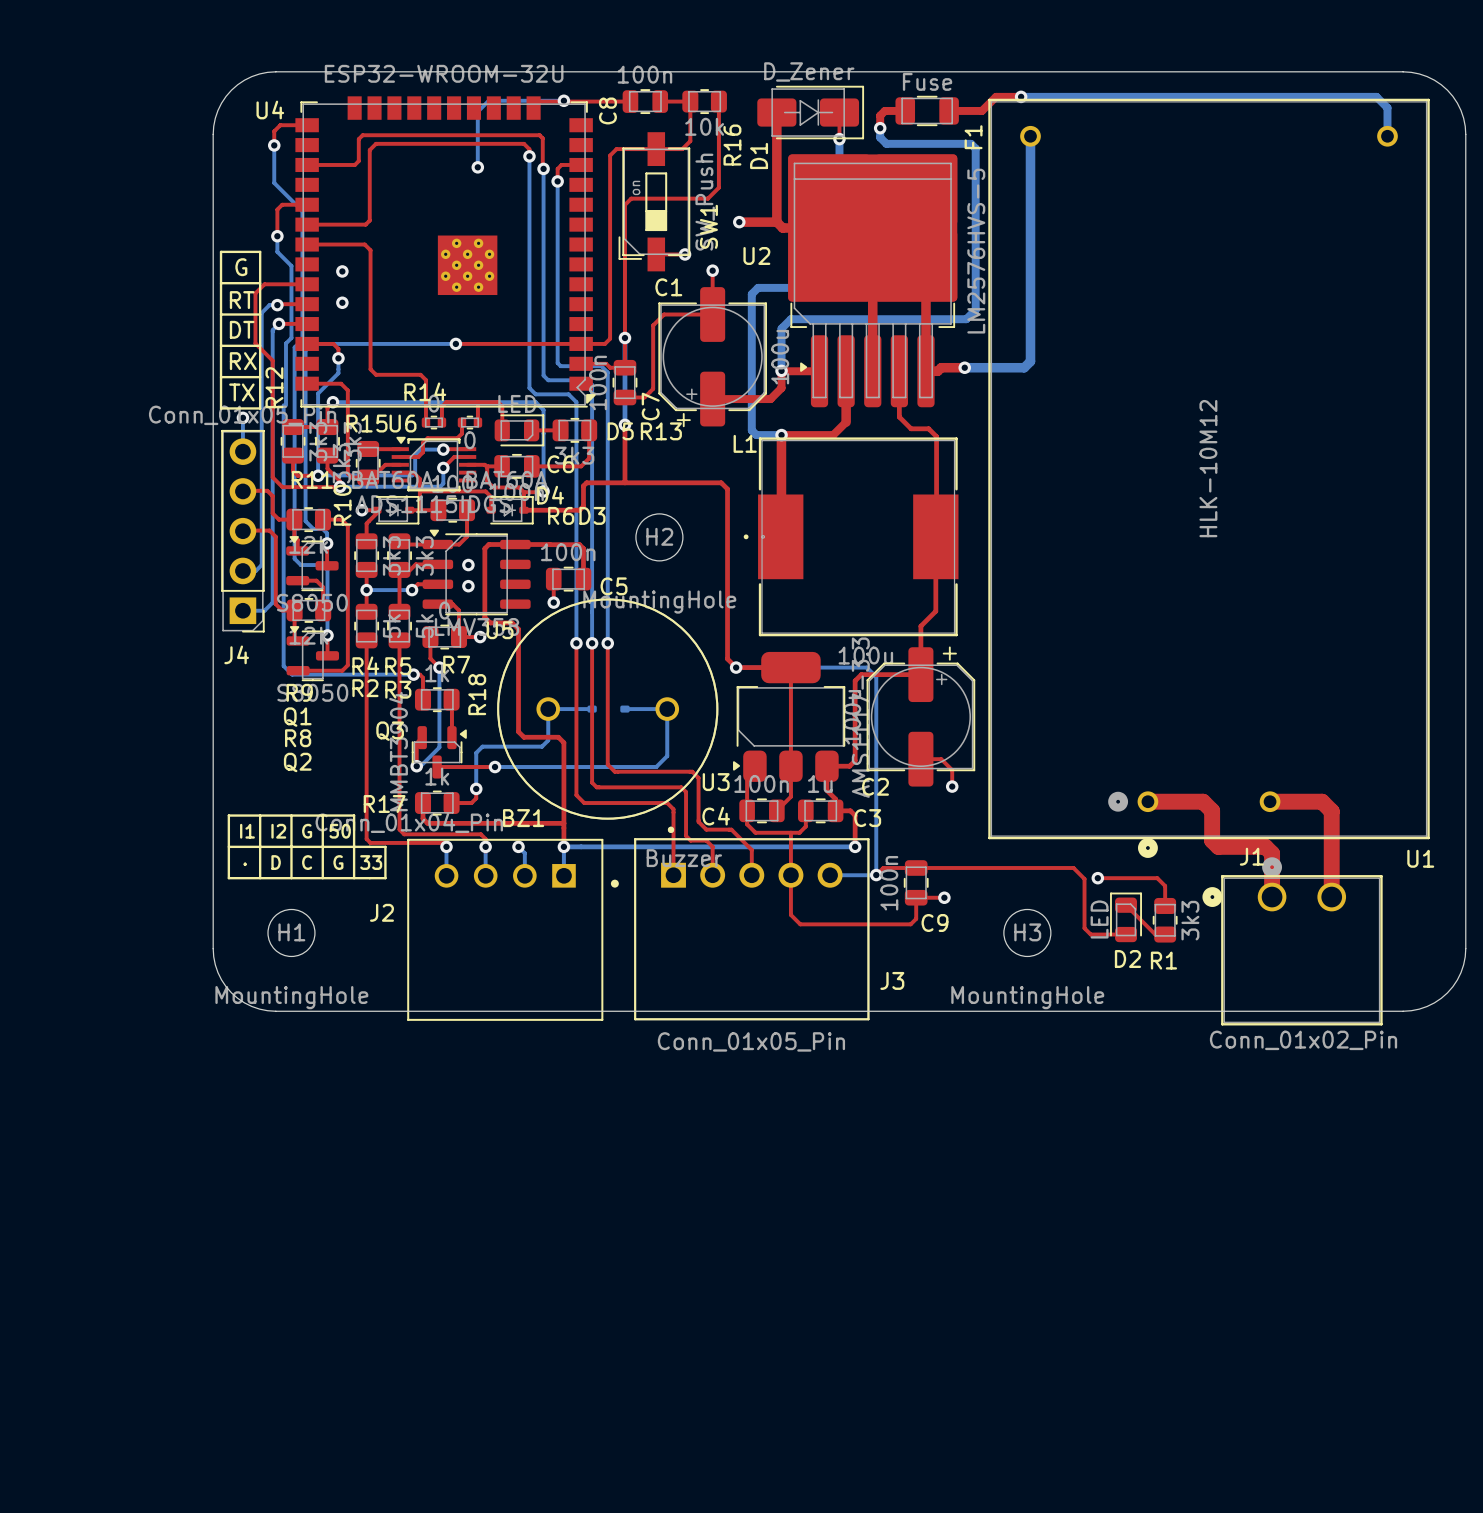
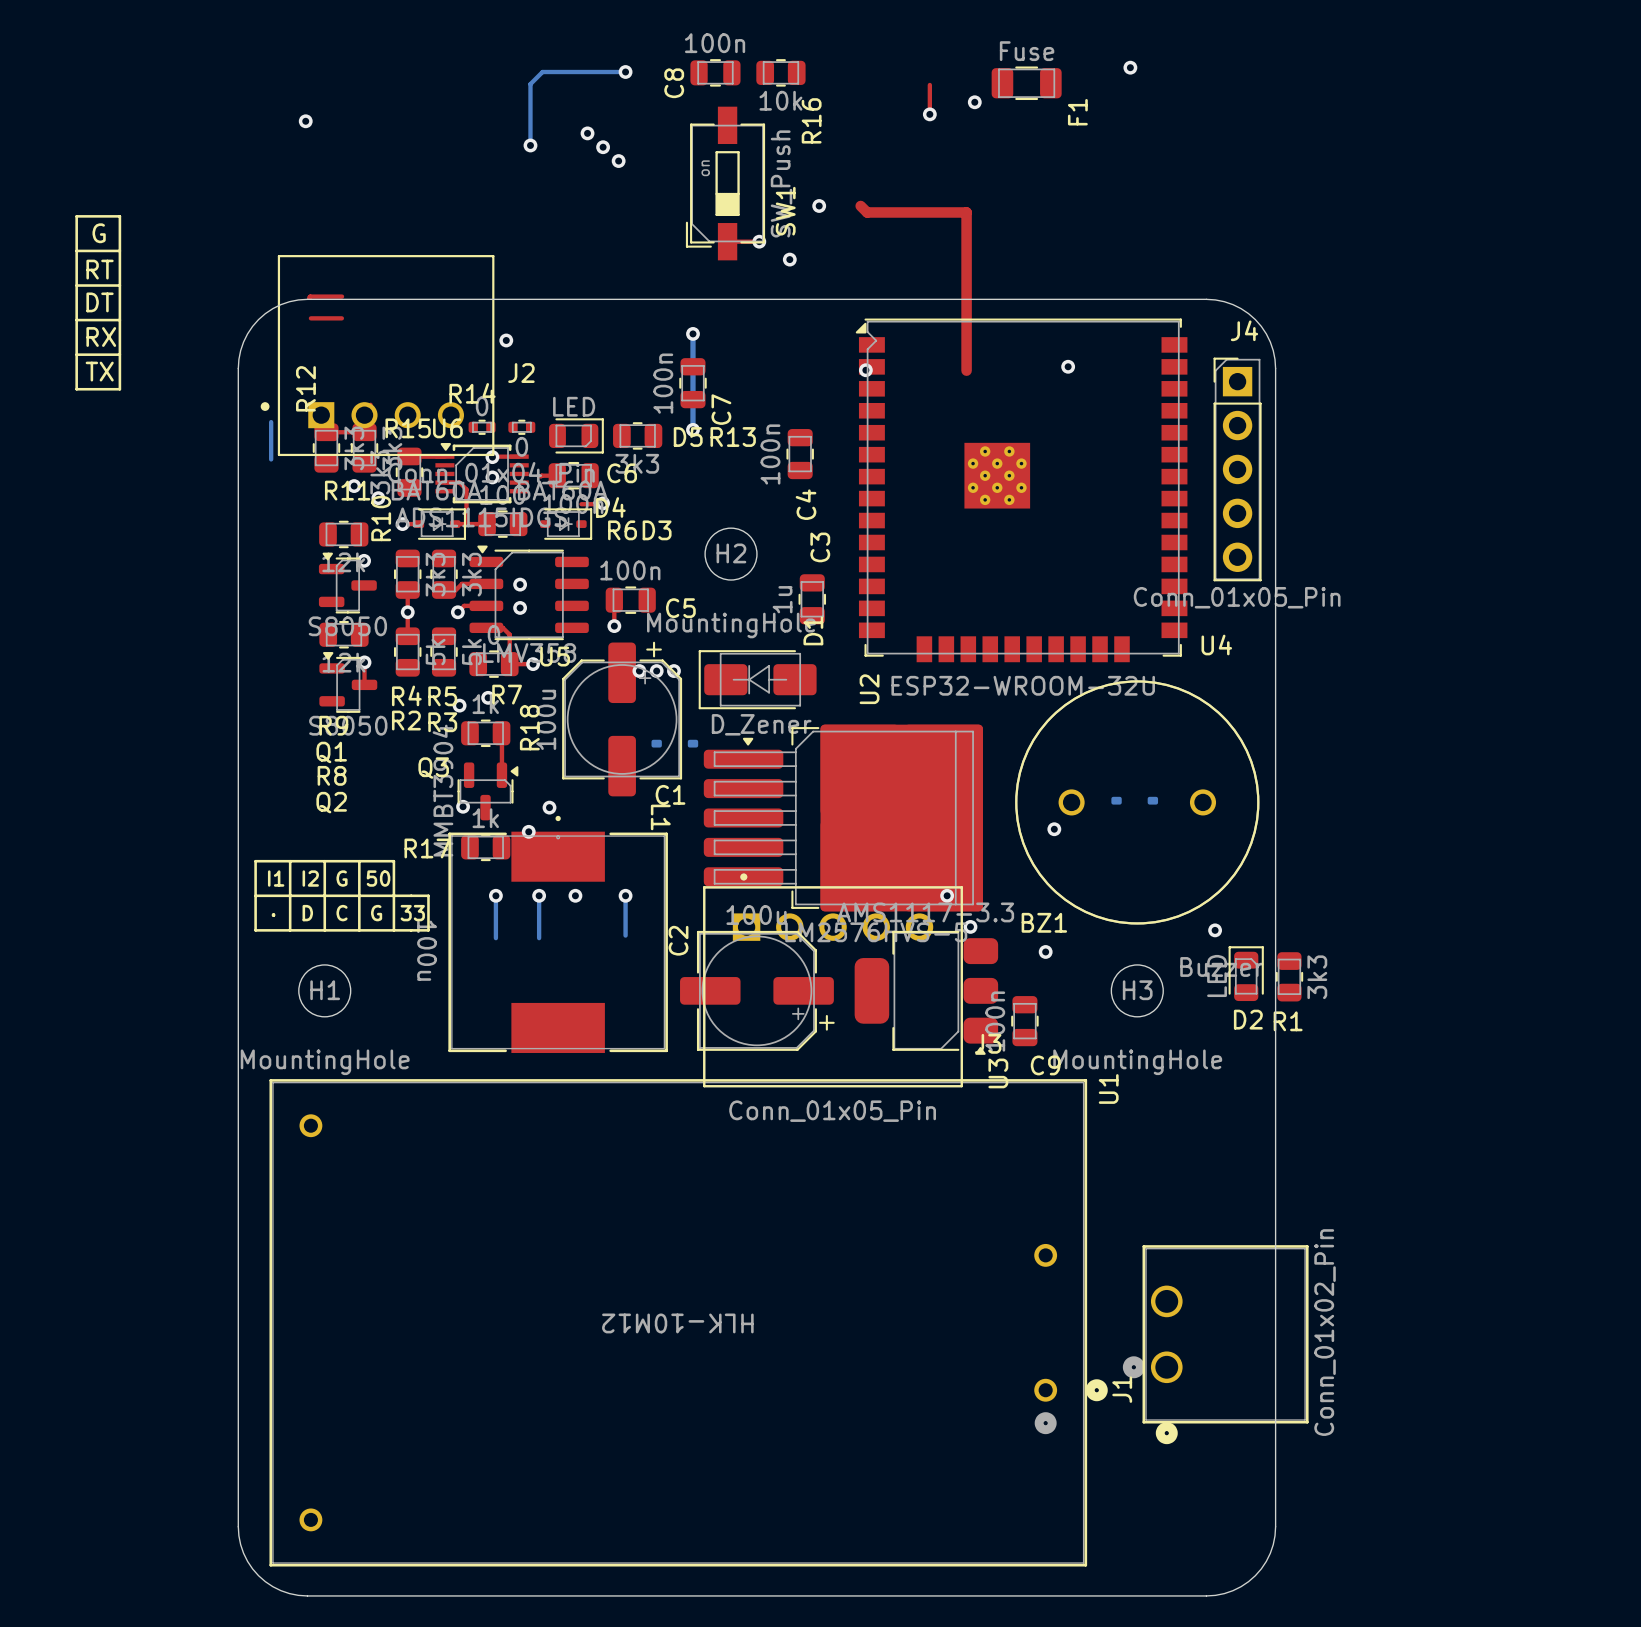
top track: (1021, 96) (996, 96) (981, 110) (949, 110) -> none
bottom track: (1021, 96) (1376, 96) (1387, 107) (1387, 136) -> none
top track: (630, 101) (540, 101) (533, 108) -> none
top track: (660, 101) (690, 101) (690, 141) (682, 149) (616, 149) (610, 155) (610, 338) (604, 343) (455, 343) -> none
top track: (718, 101) (718, 187) (707, 198) (631, 198) (624, 204) (624, 367) (610, 367) (606, 363) (581, 363) -> none
top track: (905, 110) (884, 110) (880, 115) (880, 128) -> none
top track: (776, 112) (776, 222) (739, 222) -> none
D1 rotation: 0° (810, 112) -> 180° (757, 679)
D1 position: (810, 112) -> (757, 679)
top track: (280, 125) (274, 131) (274, 145) -> none
top track: (280, 125) (307, 125) -> none
bottom track: (880, 128) (880, 137) (886, 143) (971, 143) (975, 148) (975, 309) (966, 319) (790, 319) (781, 328) (781, 370) -> none
bottom track: (1030, 136) (1030, 361) (1024, 367) (964, 367) -> none
bottom track: (839, 139) (839, 278) (830, 287) (758, 287) (751, 294) (751, 430) (756, 435) (781, 435) -> none
bottom track: (274, 145) (274, 182) (302, 211) (302, 339) (294, 347) (294, 558) (300, 565) (322, 565) (327, 569) (327, 635) -> none
top track: (529, 156) (529, 149) (523, 143) (376, 143) (369, 150) (369, 220) (365, 224) (307, 224) -> none
bottom track: (529, 156) (529, 388) (535, 394) (568, 394) (576, 402) (576, 643) -> none
top track: (307, 164) (354, 164) (358, 161) (358, 139) (362, 135) (539, 135) (542, 138) (543, 168) -> none
top track: (581, 164) (561, 164) (557, 168) (557, 181) -> none
bottom track: (543, 168) (543, 375) (548, 380) (587, 380) (592, 384) (592, 643) -> none
bottom track: (557, 181) (557, 363) (560, 366) (601, 366) (607, 372) (607, 643) -> none
top track: (307, 204) (282, 204) (277, 209) (277, 236) -> none
bottom track: (277, 236) (277, 251) (291, 265) (291, 337) (285, 343) (285, 405) -> none
via: (277, 236) -> none
top track: (307, 244) (364, 244) (370, 250) (370, 369) (376, 374) (420, 374) (425, 380) (425, 422) -> none
line: (221, 251) (221, 408) (260, 408) (260, 251) (221, 251) -> (76, 216) (76, 389) (119, 389) (119, 216) (76, 216)
U4 rotation: 0° (445, 251) -> 180° (1021, 490)
U4 position: (445, 251) -> (1021, 490)
top track: (916, 265) (925, 275) (925, 371) (937, 371) (941, 367) (964, 367) -> none
text position: G (241, 267) -> G (99, 233)
top track: (712, 270) (712, 314) (664, 314) (653, 325) (653, 388) (644, 397) (624, 397) -> none
via: (342, 271) -> none
U2 rotation: 0° (872, 280) -> 90° clockwise (843, 817)
U2 position: (872, 280) -> (843, 817)
line: (221, 283) (260, 283) -> (76, 250) (119, 250)
top track: (307, 284) (264, 284) (255, 293) (255, 343) (272, 360) (272, 477) (282, 487) (339, 487) (340, 481) (327, 468) (327, 455) -> none
text position: RT (242, 300) -> RT (100, 269)
via: (342, 302) -> none
bottom track: (277, 305) (269, 305) (261, 312) (261, 565) (255, 570) (242, 570) -> none
via: (277, 305) -> none
line: (221, 314) (260, 314) -> (76, 285) (119, 285)
bottom track: (278, 323) (272, 330) (272, 602) (264, 610) (242, 610) -> none
via: (278, 323) -> none
text position: DT (242, 329) -> DT (100, 302)
top track: (307, 343) (333, 343) (338, 348) (338, 358) -> none
bottom track: (455, 343) (310, 343) (305, 348) (305, 521) (313, 529) (322, 529) (327, 533) (327, 543) -> none
line: (221, 345) (260, 345) -> (76, 320) (119, 320)
C1 rotation: 0° (712, 357) -> 180° (622, 719)
C1 position: (712, 357) -> (622, 719)
bottom track: (338, 358) (338, 373) (318, 393) (318, 475) (412, 475) (415, 472) (415, 455) (421, 449) (443, 449) -> none
via: (338, 358) -> none
text position: RX (243, 361) -> RX (101, 336)
board edge: (213, 369) (213, 126) (217, 110) (231, 90) (251, 76) (267, 72) (1403, 71) (1427, 76) (1447, 90) (1461, 110) (1465, 126) (1465, 948) (1463, 964) (1457, 979) (1447, 992) (1434, 1002) (1419, 1009) (1403, 1011) (275, 1011) (251, 1006) (231, 992) (217, 972) (213, 948) -> (238, 368) (243, 342) (258, 319) (281, 304) (307, 299) (1206, 299) (1224, 301) (1241, 308) (1261, 326) (1270, 342) (1275, 368) (1275, 1526) (1273, 1544) (1266, 1561) (1255, 1575) (1241, 1586) (1224, 1593) (1206, 1595) (307, 1595) (289, 1593) (272, 1586) (258, 1575) (247, 1561) (240, 1544) (238, 1526) (238, 1008)
top track: (819, 371) (781, 370) (781, 388) (770, 399) (712, 399) -> none
top track: (846, 371) (846, 422) (833, 435) (781, 435) -> none
top track: (899, 371) (899, 417) (911, 428) (928, 428) (936, 436) (936, 529) -> none
line: (221, 377) (260, 377) -> (76, 354) (119, 354)
top track: (307, 383) (341, 383) (347, 390) (347, 473) (351, 477) (372, 477) (385, 464) (400, 464) -> none
text position: TX (241, 392) -> TX (99, 371)
bottom track: (332, 402) (535, 402) (543, 410) (543, 491) -> none
via: (332, 402) -> none
top track: (477, 402) (477, 422) -> none
bottom track: (283, 405) (283, 666) (292, 674) (413, 674) -> none
via: (242, 417) -> none
top track: (441, 422) (441, 406) (446, 402) (498, 402) (502, 406) (502, 430) -> none
top track: (461, 422) (461, 433) (457, 438) (427, 438) (423, 442) (423, 452) (418, 456) (400, 456) -> none
top track: (625, 425) (624, 482) -> none
top track: (531, 430) (560, 430) -> none
top track: (589, 430) (589, 458) (581, 466) (531, 466) -> none
top track: (781, 435) (781, 529) -> none
via: (781, 435) -> none
top track: (293, 455) (293, 471) (297, 475) (318, 475) -> none
top track: (467, 456) (454, 456) (443, 467) -> none
top track: (467, 464) (484, 464) (487, 467) (487, 481) (493, 487) (519, 487) (523, 492) (523, 510) (579, 510) (583, 506) (583, 485) (586, 482) (721, 482) (727, 489) (727, 658) (736, 667) (790, 667) (790, 796) (776, 810) -> none
bottom track: (443, 467) (443, 483) (440, 486) (340, 486) -> none
U1 rotation: 0° (1209, 478) -> 90° counterclockwise (688, 1322)
U1 position: (1209, 478) -> (688, 1322)
top track: (246, 490) (267, 490) (272, 496) (272, 513) (278, 519) (294, 519) (294, 536) (297, 539) (297, 550) -> none
top track: (419, 491) (485, 491) (491, 496) (491, 510) -> none
top track: (376, 513) (366, 523) (366, 544) -> none
top track: (467, 513) (467, 536) (459, 544) (399, 544) -> none
top track: (322, 519) (341, 519) (347, 525) (347, 665) (342, 670) (298, 670) -> none
top track: (246, 530) (269, 530) (275, 536) (275, 604) (282, 610) (294, 610) (294, 637) (298, 640) -> none
J4 rotation: 0° (242, 531) -> 180° (1237, 469)
J4 position: (242, 531) -> (1237, 469)
L1 rotation: 0° (851, 536) -> 90° clockwise (558, 934)
L1 position: (851, 536) -> (558, 934)
top track: (935, 536) (935, 611) (920, 626) (920, 674) (861, 674) (855, 680) (855, 760) (849, 766) (826, 766) (826, 790) (835, 799) (835, 810) (850, 810) (855, 815) (855, 846) -> none
top track: (327, 543) (327, 565) -> none
top track: (549, 544) (488, 544) (484, 548) (484, 617) (490, 622) (512, 622) (518, 629) (518, 731) (523, 737) (558, 737) (563, 742) (563, 846) -> none
top track: (549, 544) (579, 544) (583, 548) (583, 579) -> none
top track: (399, 569) (399, 611) -> none
top track: (297, 580) (316, 580) (323, 587) (323, 610) -> none
bottom track: (366, 590) (412, 590) -> none
top track: (430, 637) (430, 658) (439, 667) -> none
top track: (366, 640) (366, 839) (370, 842) (442, 842) (446, 846) -> none
top track: (399, 640) (399, 829) (404, 834) (480, 834) (485, 839) (485, 851) -> none
top track: (592, 643) (592, 782) (596, 787) (681, 787) (686, 792) (686, 835) (690, 840) (706, 840) (712, 846) (712, 875) -> none
top track: (607, 644) (607, 764) (614, 771) (692, 771) (698, 777) (698, 821) (706, 829) (731, 829) (751, 849) (751, 875) -> none
top track: (576, 647) (576, 795) (584, 803) (667, 803) (673, 809) (673, 875) -> none
bottom track: (439, 667) (439, 747) (420, 766) (416, 766) -> none
bottom track: (736, 667) (866, 667) (876, 676) (876, 875) -> none
via: (736, 667) -> none
top track: (413, 674) (419, 674) (423, 677) (423, 699) -> none
bottom track: (592, 709) (548, 709) (548, 740) (541, 746) (482, 746) (476, 752) (476, 788) -> none
BZ1 position: (607, 709) -> (1137, 802)
bottom track: (624, 709) (667, 709) (667, 756) (656, 767) (495, 767) -> none
U3 rotation: 0° (789, 716) -> 90° counterclockwise (926, 992)
U3 position: (789, 716) -> (926, 992)
C2 rotation: 0° (920, 716) -> 90° clockwise (757, 990)
C2 position: (920, 716) -> (757, 990)
top track: (422, 737) (416, 743) (416, 766) -> none
top track: (920, 759) (941, 759) (952, 770) (952, 786) -> none
part: none -> (1134, 800)
top track: (754, 766) (747, 774) (747, 824) (755, 832) (799, 832) (805, 826) (805, 810) -> none
top track: (437, 767) (495, 767) -> none
C4 value position: 100n (761, 783) -> 100n (770, 454)
C3 value position: 1u (820, 783) -> 1u (782, 599)
top track: (476, 788) (476, 798) (471, 803) (451, 803) -> none
top track: (1147, 801) (1202, 801) (1212, 810) (1212, 840) (1218, 846) (1265, 846) (1272, 853) (1272, 897) -> none
top track: (1270, 801) (1321, 801) (1331, 811) (1331, 897) -> none
top track: (423, 803) (423, 818) (427, 823) (563, 823) -> none
C4 rotation: 0° (761, 810) -> 90° clockwise (800, 454)
C4 position: (761, 810) -> (800, 454)
C3 rotation: 0° (820, 810) -> 90° clockwise (812, 599)
C3 position: (820, 810) -> (812, 599)
C4 name position: C4 (716, 816) -> C4 (806, 504)
C3 name position: C3 (867, 818) -> C3 (820, 547)
top track: (790, 832) (790, 914) (800, 924) (910, 924) (916, 918) (916, 897) (944, 897) -> none
bottom track: (518, 846) (524, 853) (524, 875) -> none
bottom track: (563, 846) (855, 846) -> none
bottom track: (830, 875) (876, 875) -> none
top track: (876, 875) (883, 867) (1073, 867) (1084, 878) (1084, 928) (1090, 934) (1126, 934) -> none
top track: (1097, 878) (1157, 878) (1165, 886) (1165, 905) -> none
C9 position: (916, 882) -> (1024, 1021)
top track: (1126, 905) (1155, 934) (1165, 934) -> none
J2 rotation: 0° (513, 929) -> 180° (377, 355)
J2 position: (513, 929) -> (377, 355)
J1 rotation: 0° (1292, 941) -> 90° counterclockwise (1215, 1344)
J1 position: (1292, 941) -> (1215, 1344)

